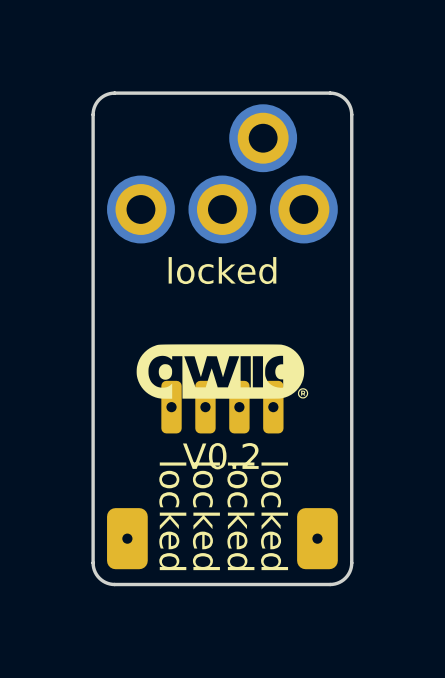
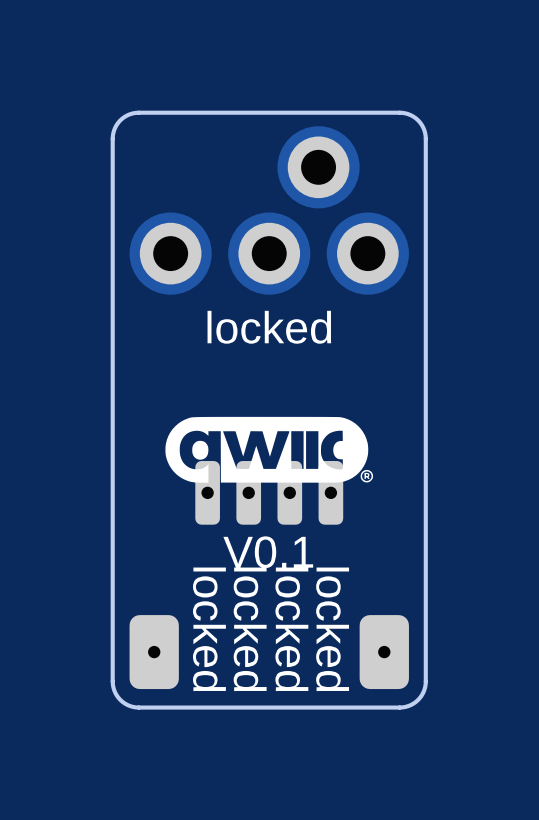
text: V0.2 (220, 456) -> V0.1 (268, 552)

